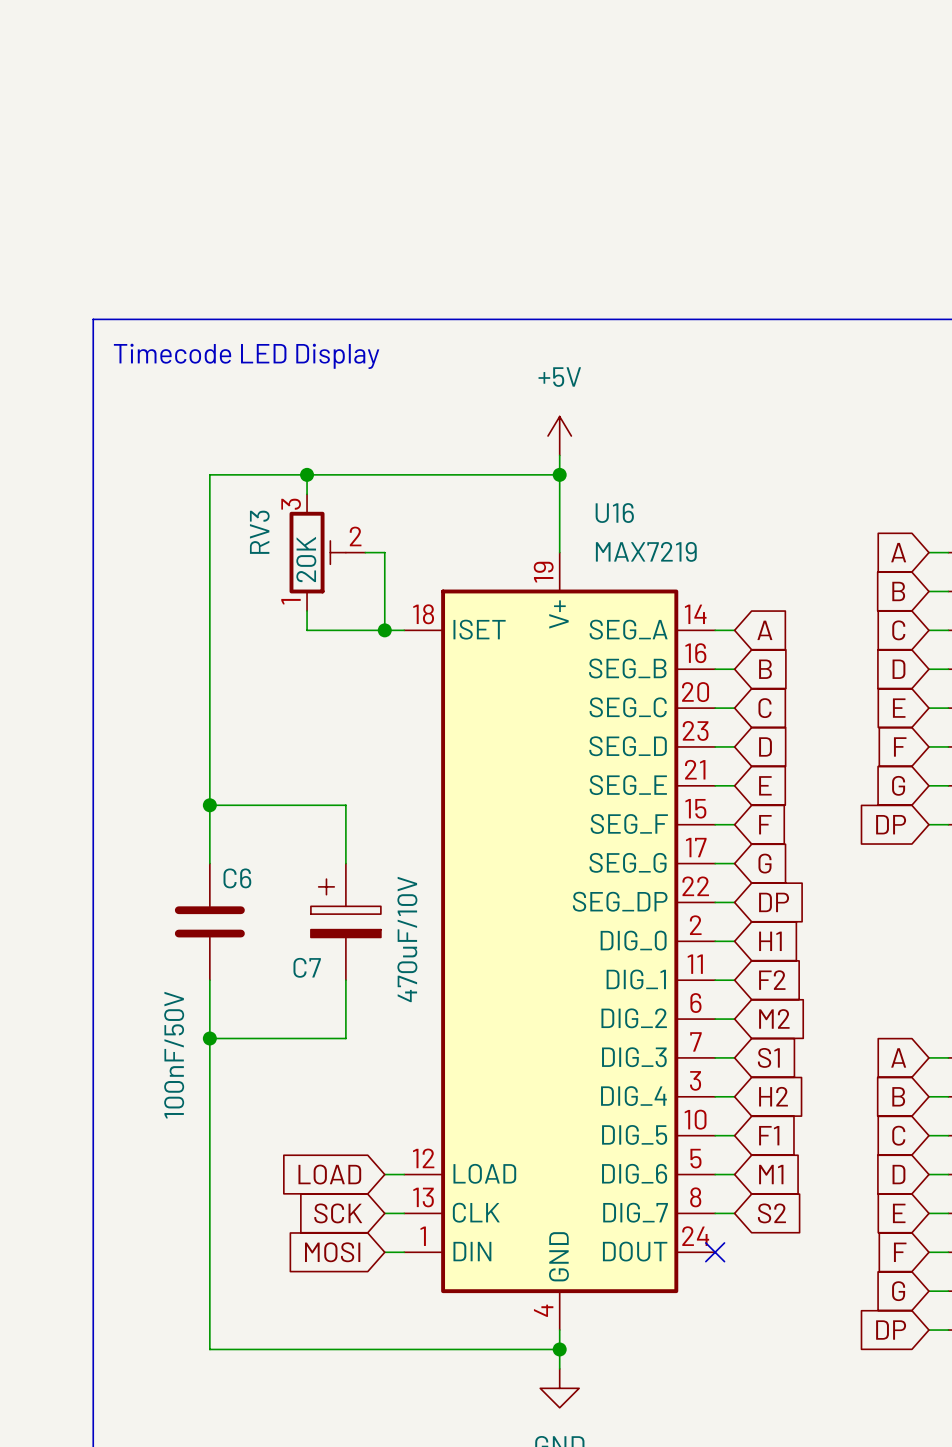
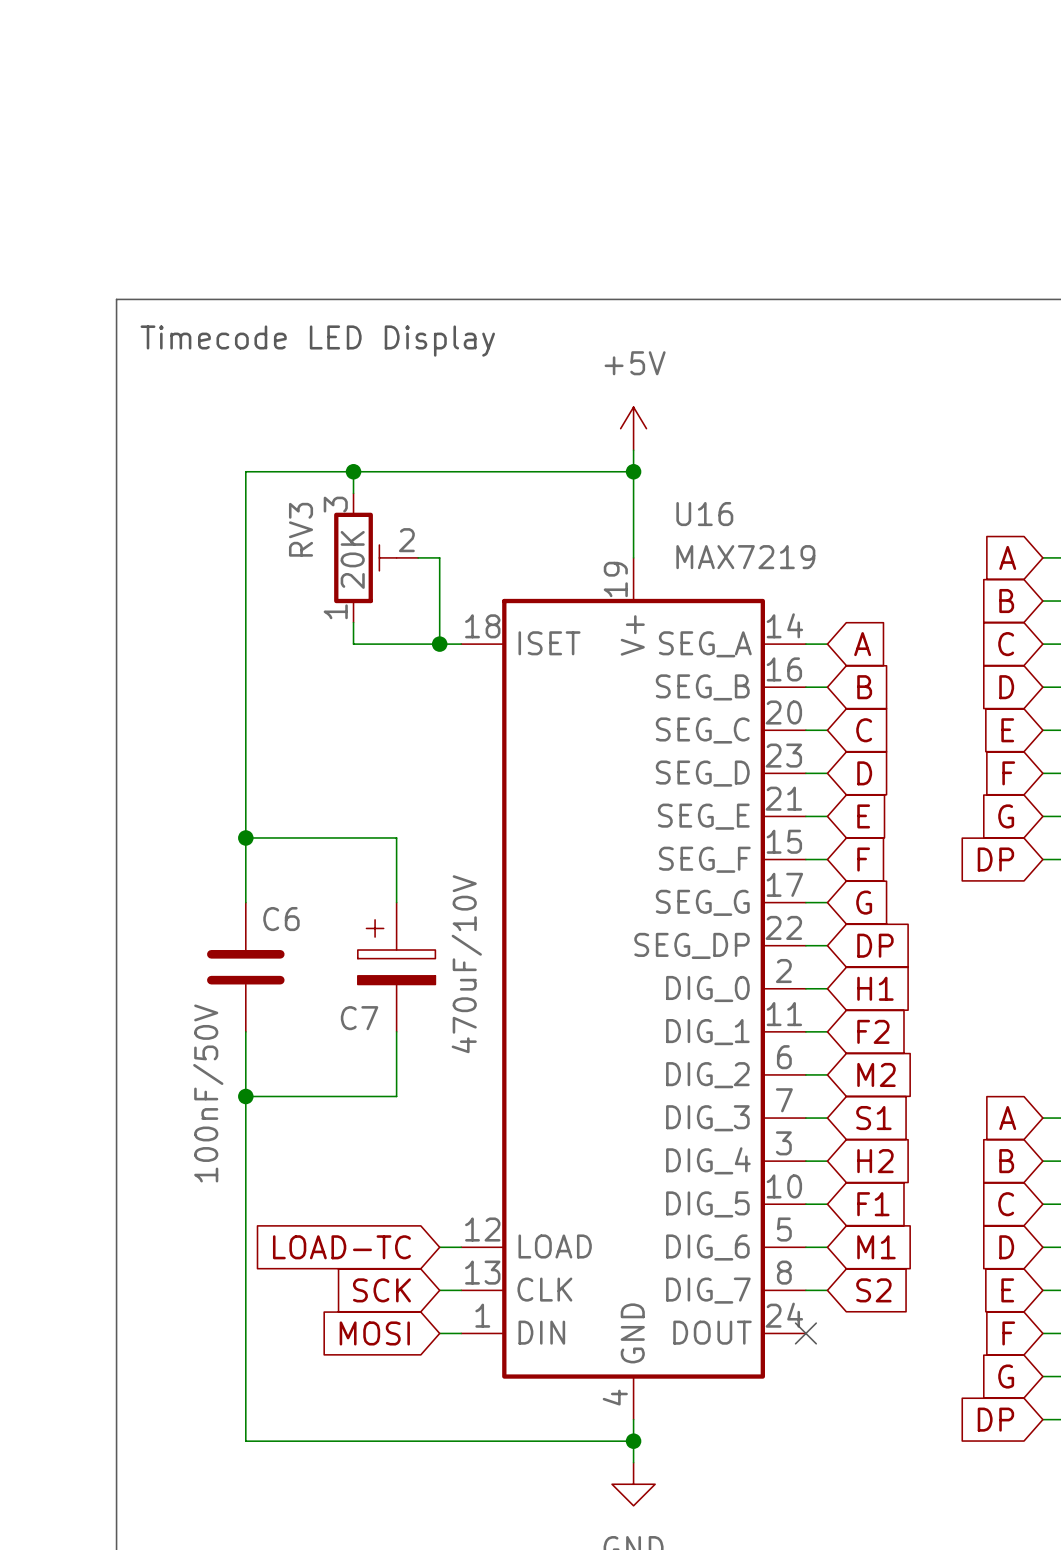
global label: LOAD (329, 1174) -> LOAD-TC (341, 1247)

